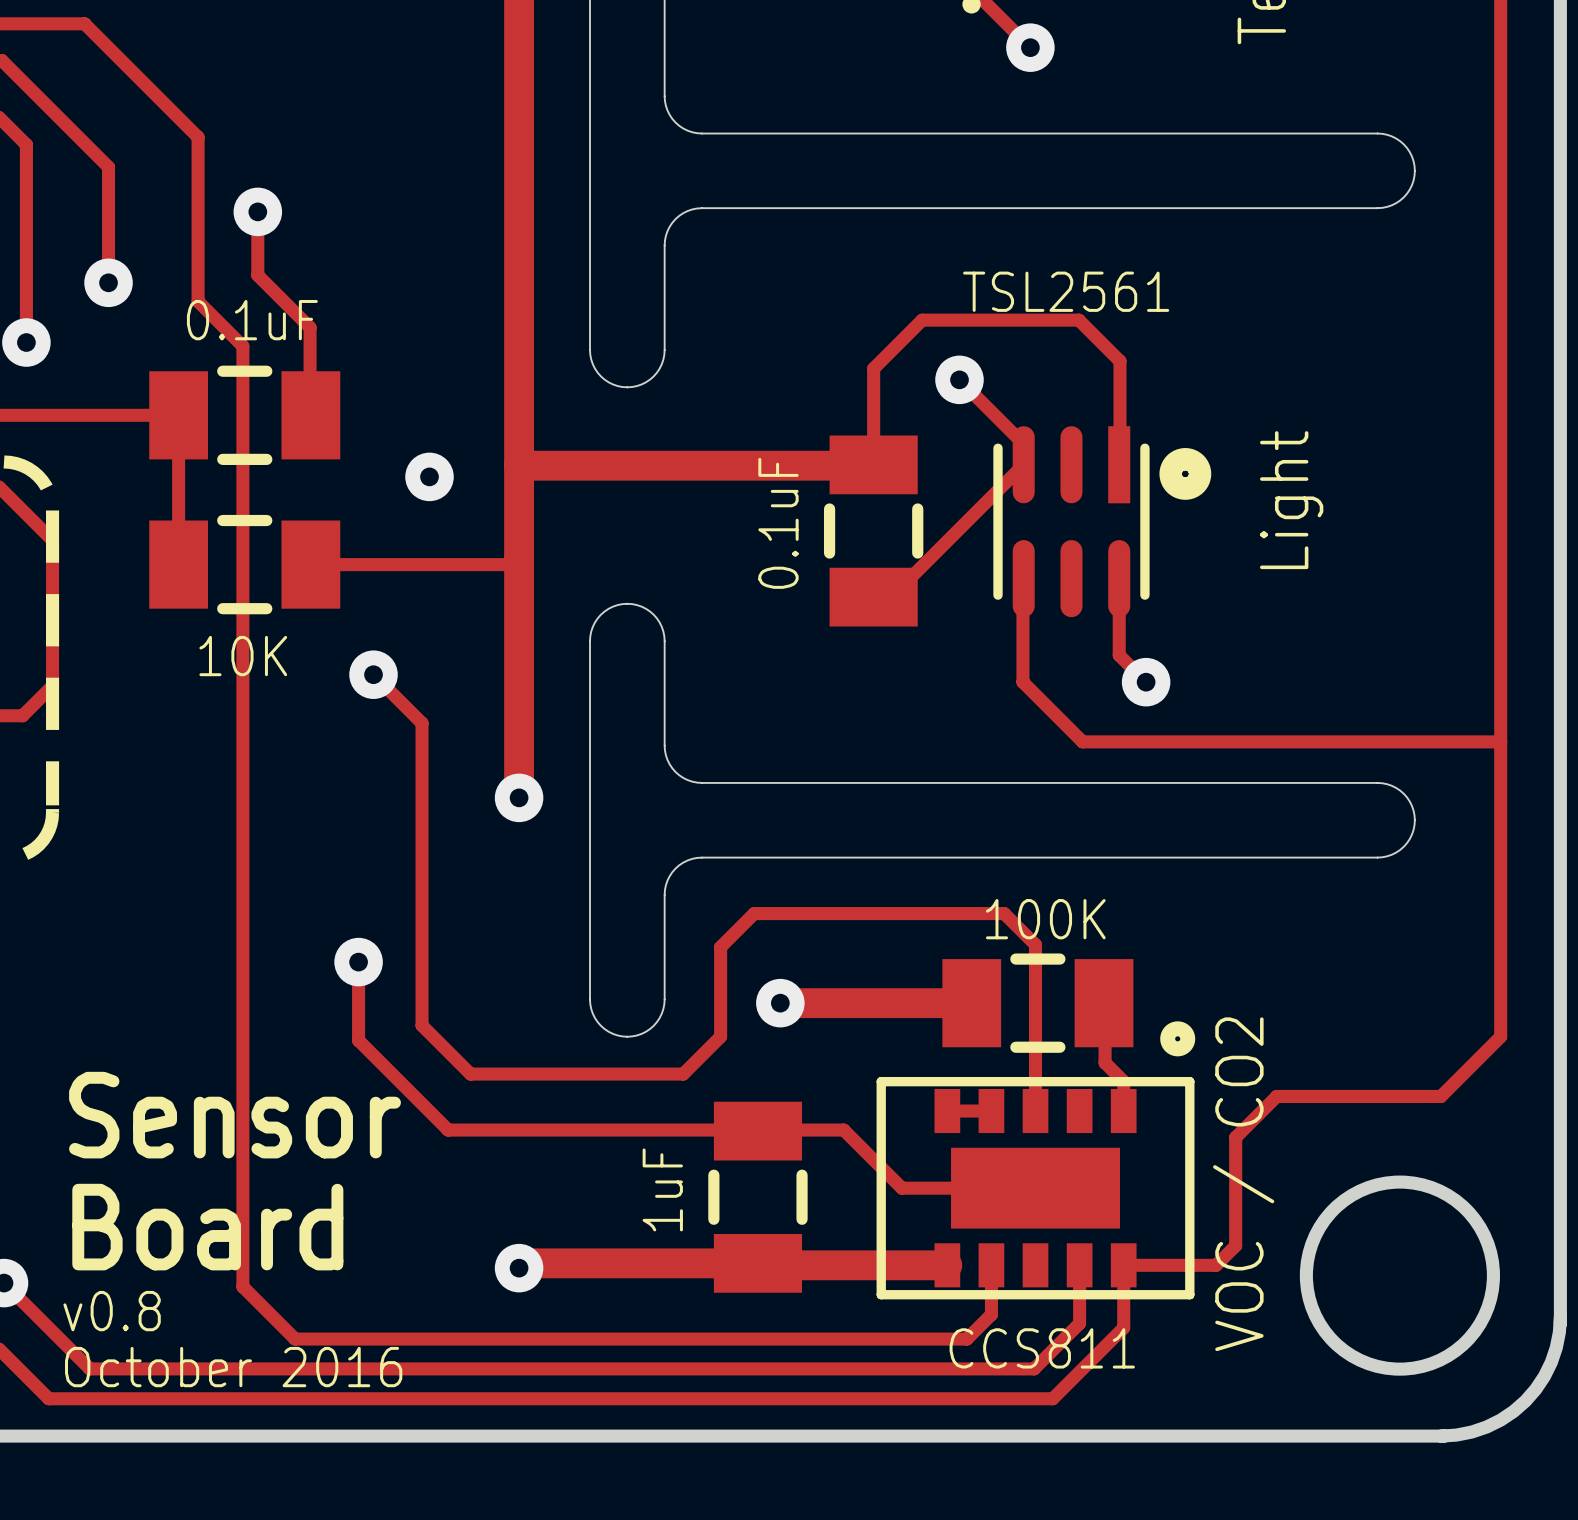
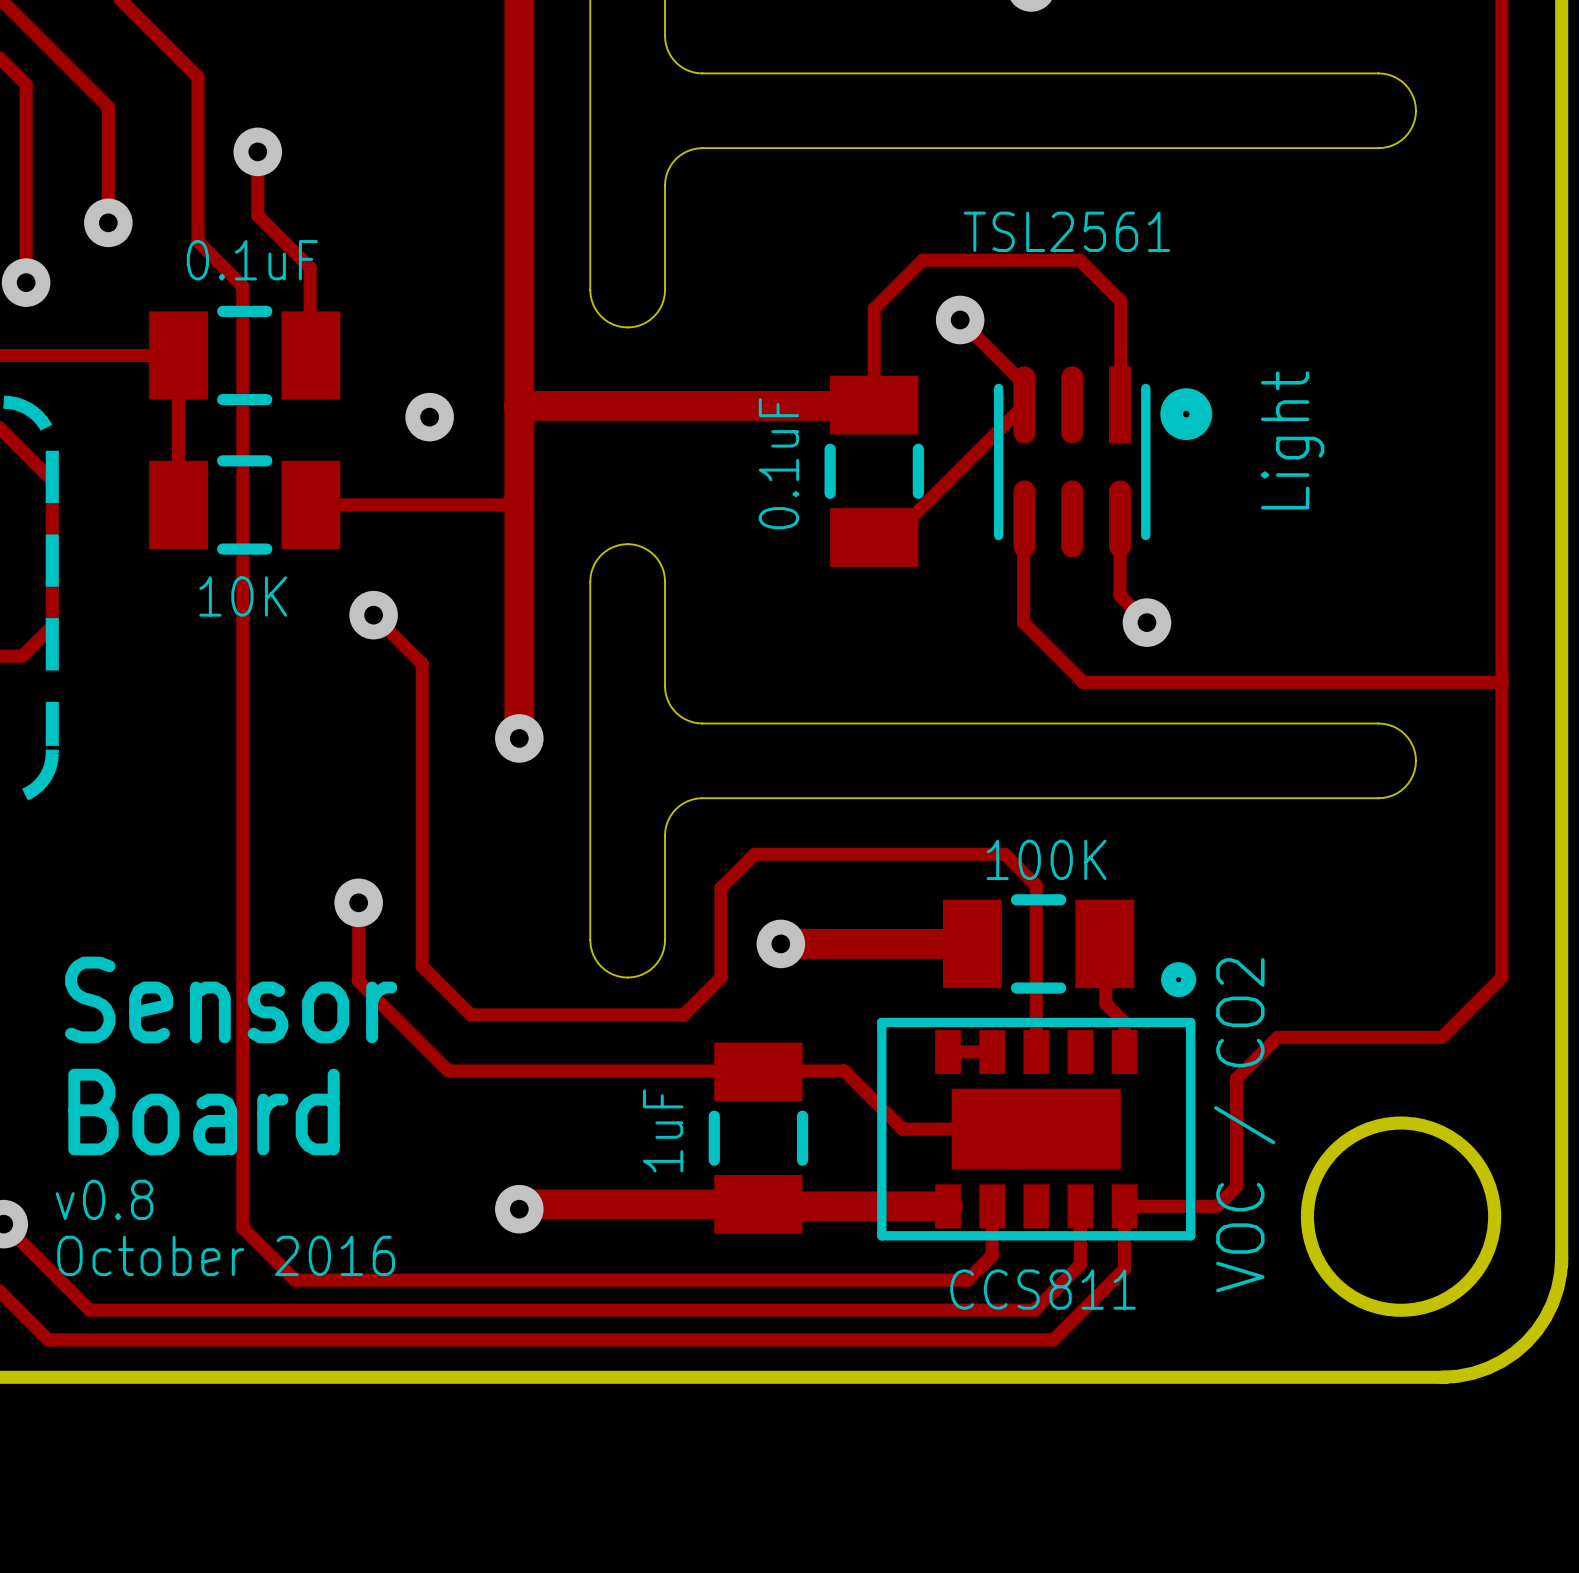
text position: Sensor (235, 1115) -> Sensor (231, 999)
text position: Board (207, 1227) -> Board (204, 1112)
text position: v0.8 (112, 1311) -> v0.8 (104, 1199)
text position: October 2016 (233, 1367) -> October 2016 (226, 1255)

